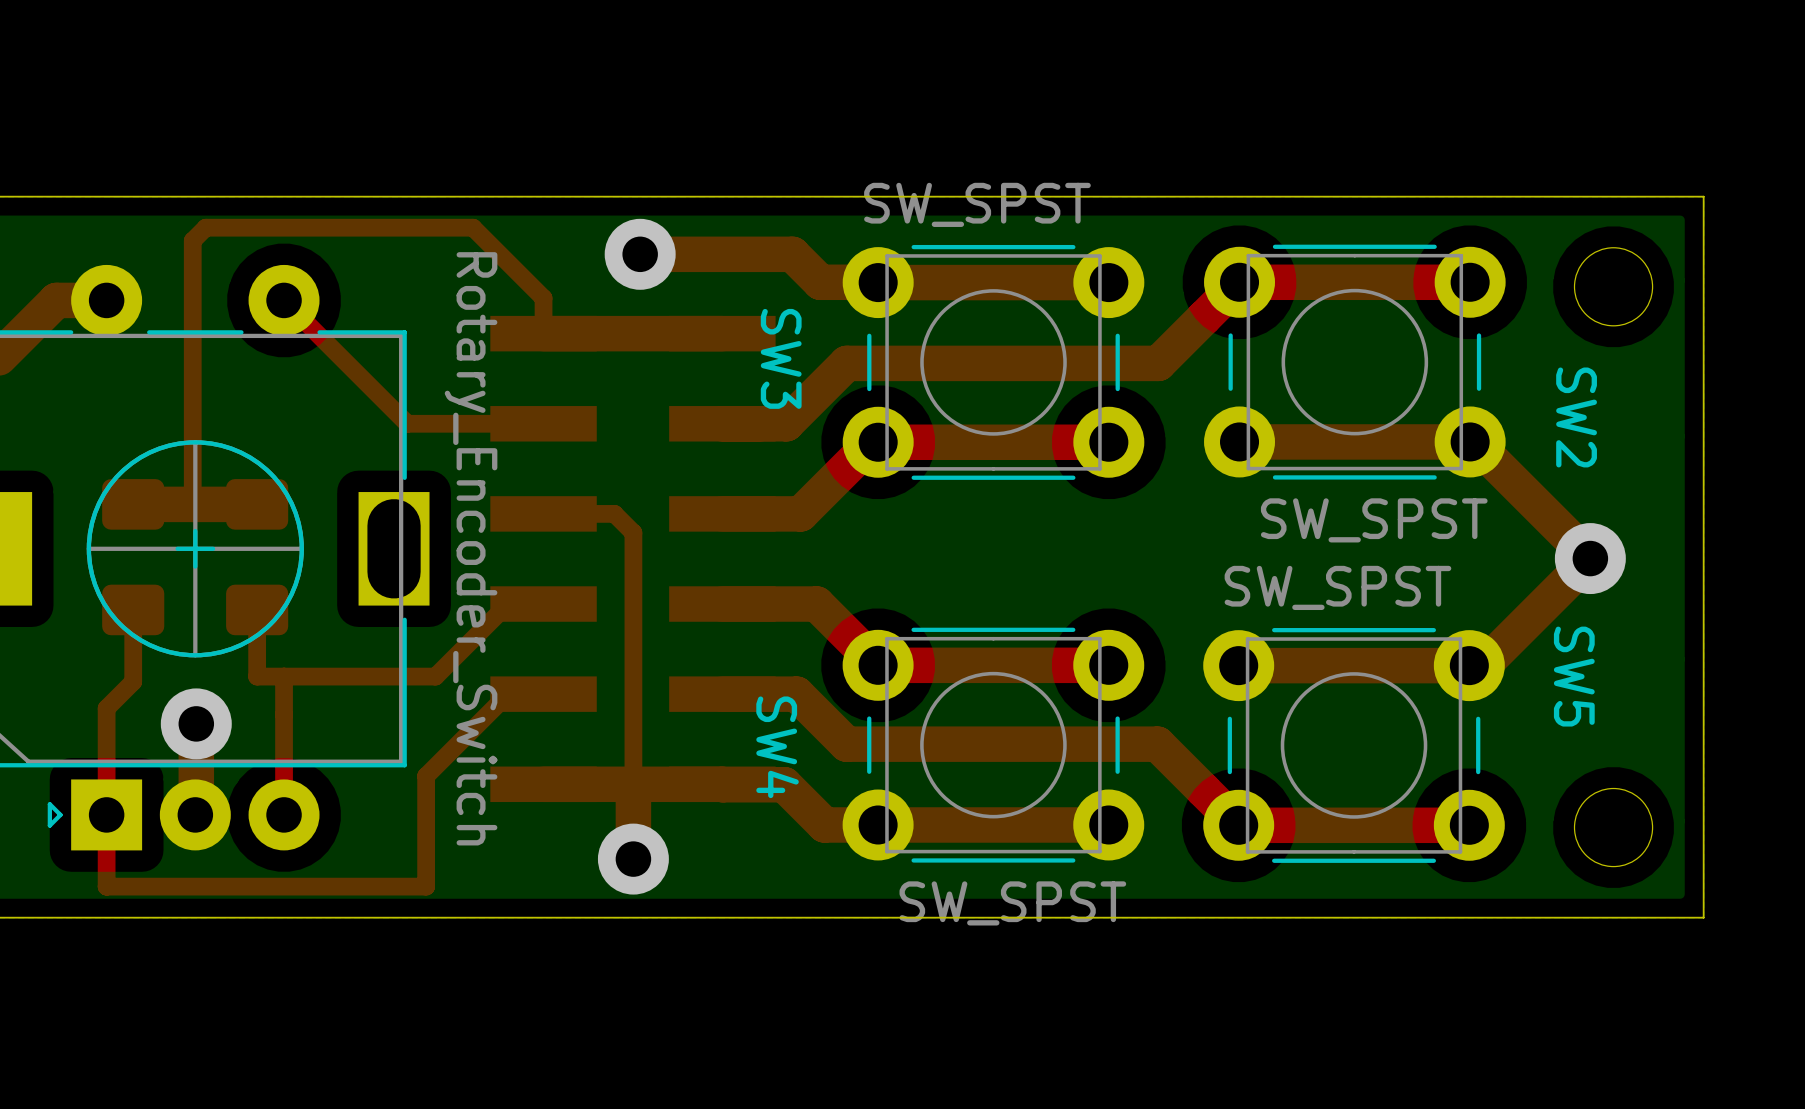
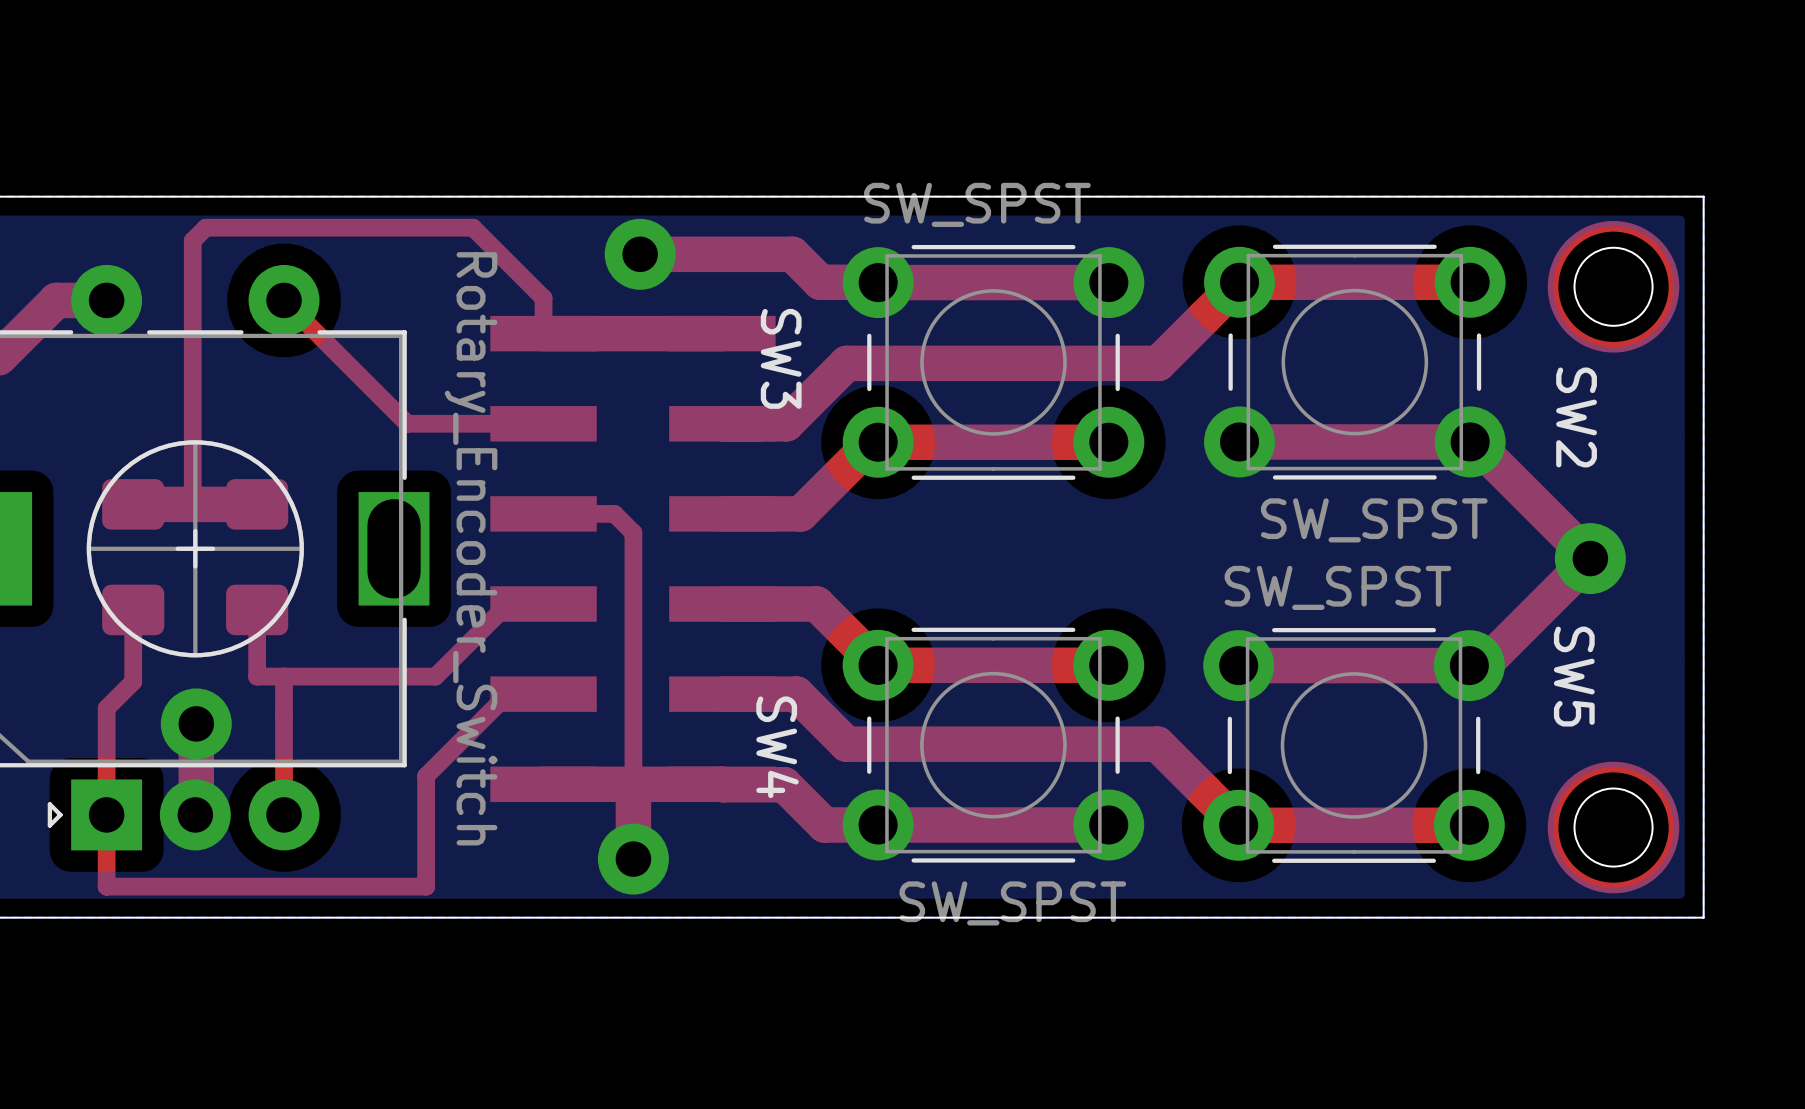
drawing: none -> [1547, 221, 1680, 353]
drawing: none -> [1547, 761, 1680, 894]

